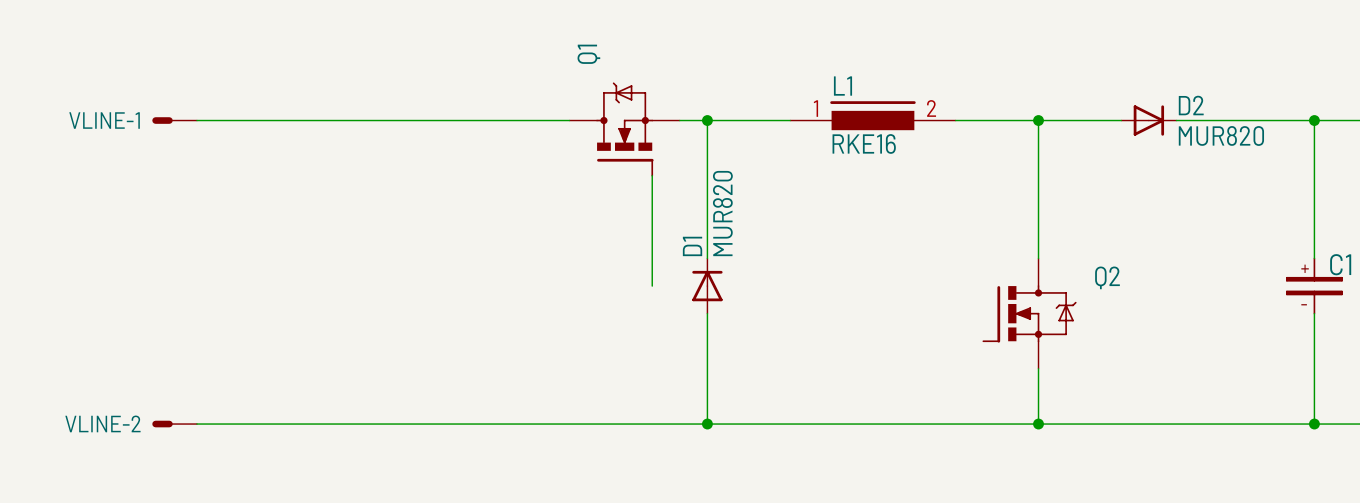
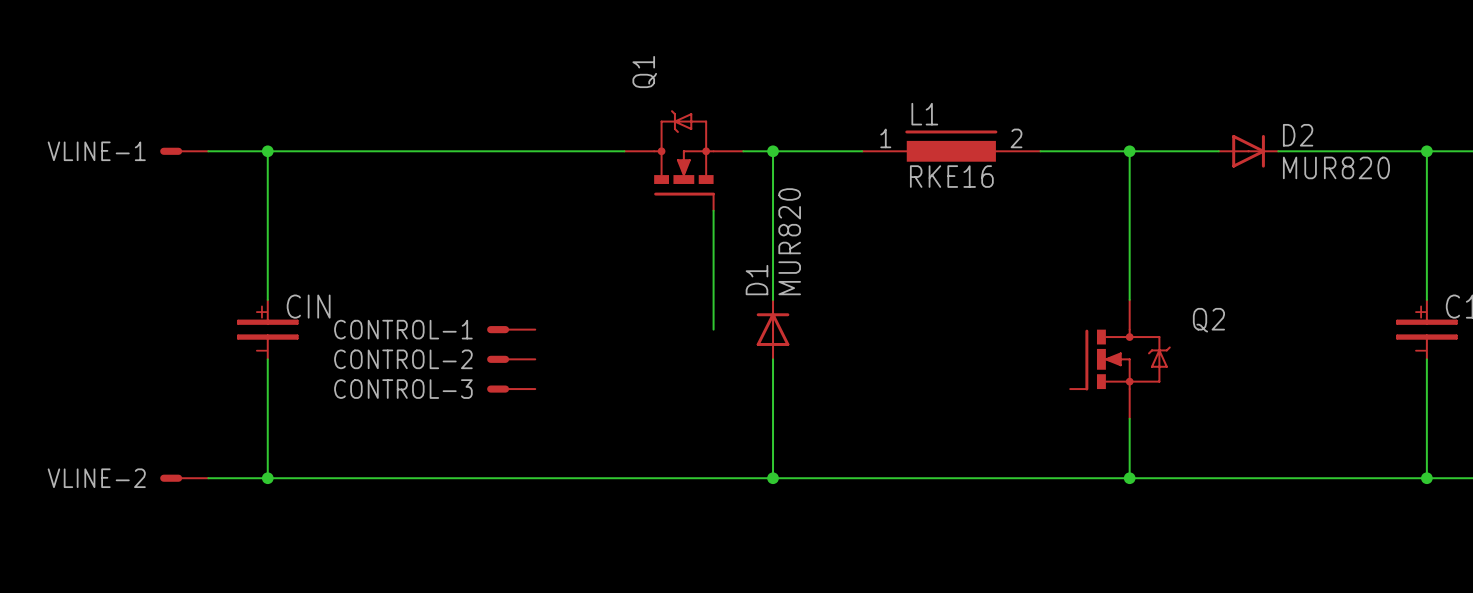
VLINE-1 position: (174, 120) -> (184, 151)
wire: none -> (267, 151) (267, 299)
junction: none -> (267, 151)
CIN: none -> (267, 329)
CONTROL-1: none -> (511, 329)
wire: none -> (267, 359) (267, 478)
CONTROL-2: none -> (511, 359)
CONTROL-3: none -> (511, 389)
VLINE-2 position: (174, 424) -> (184, 478)
junction: none -> (267, 478)

